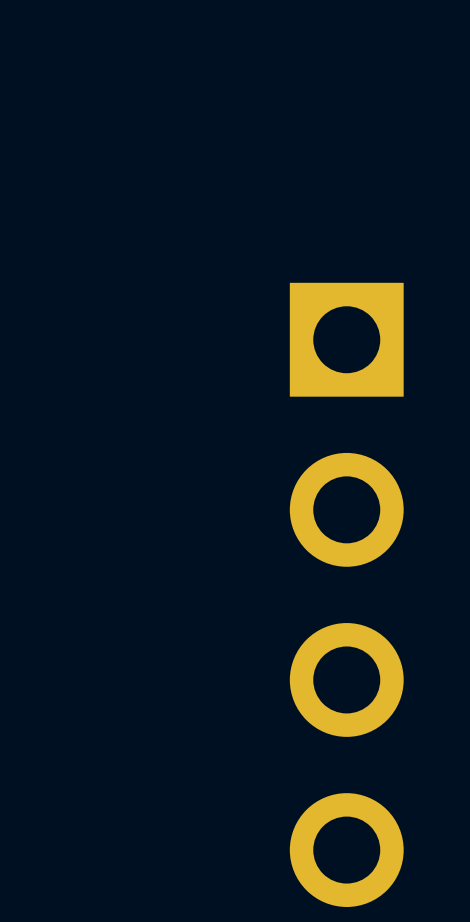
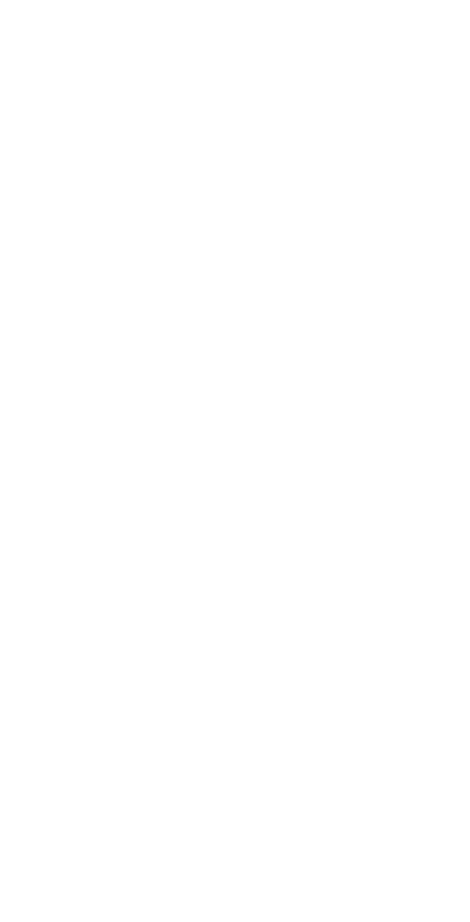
part: (346, 594) -> none

